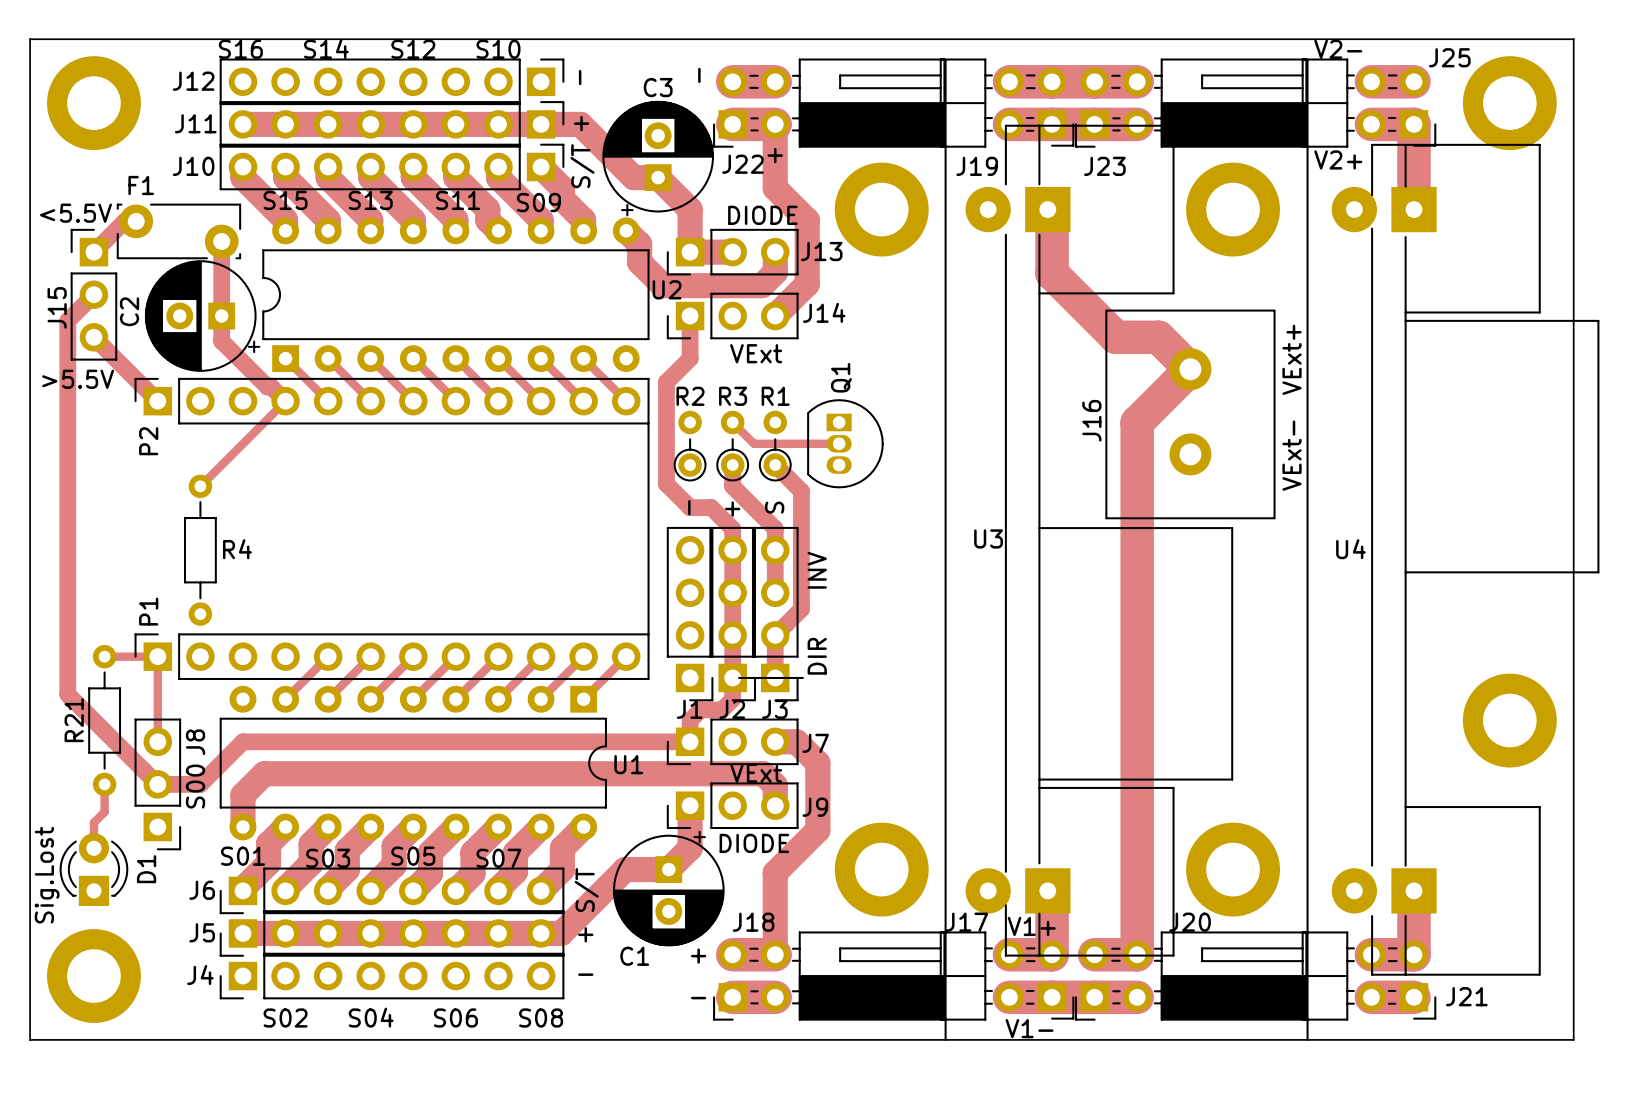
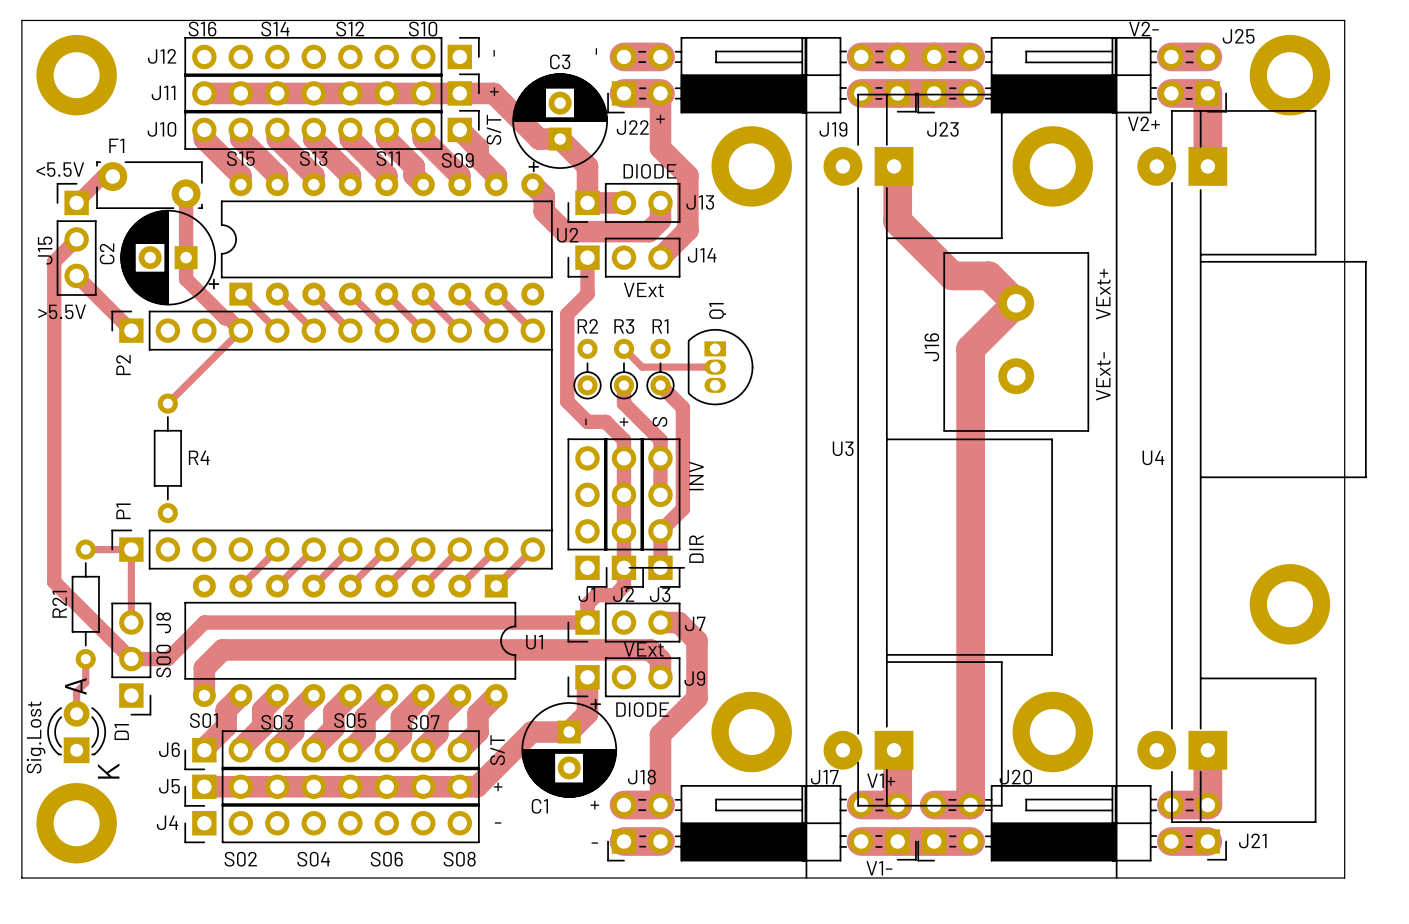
text: none -> A (75, 686)
text: none -> K (108, 771)

